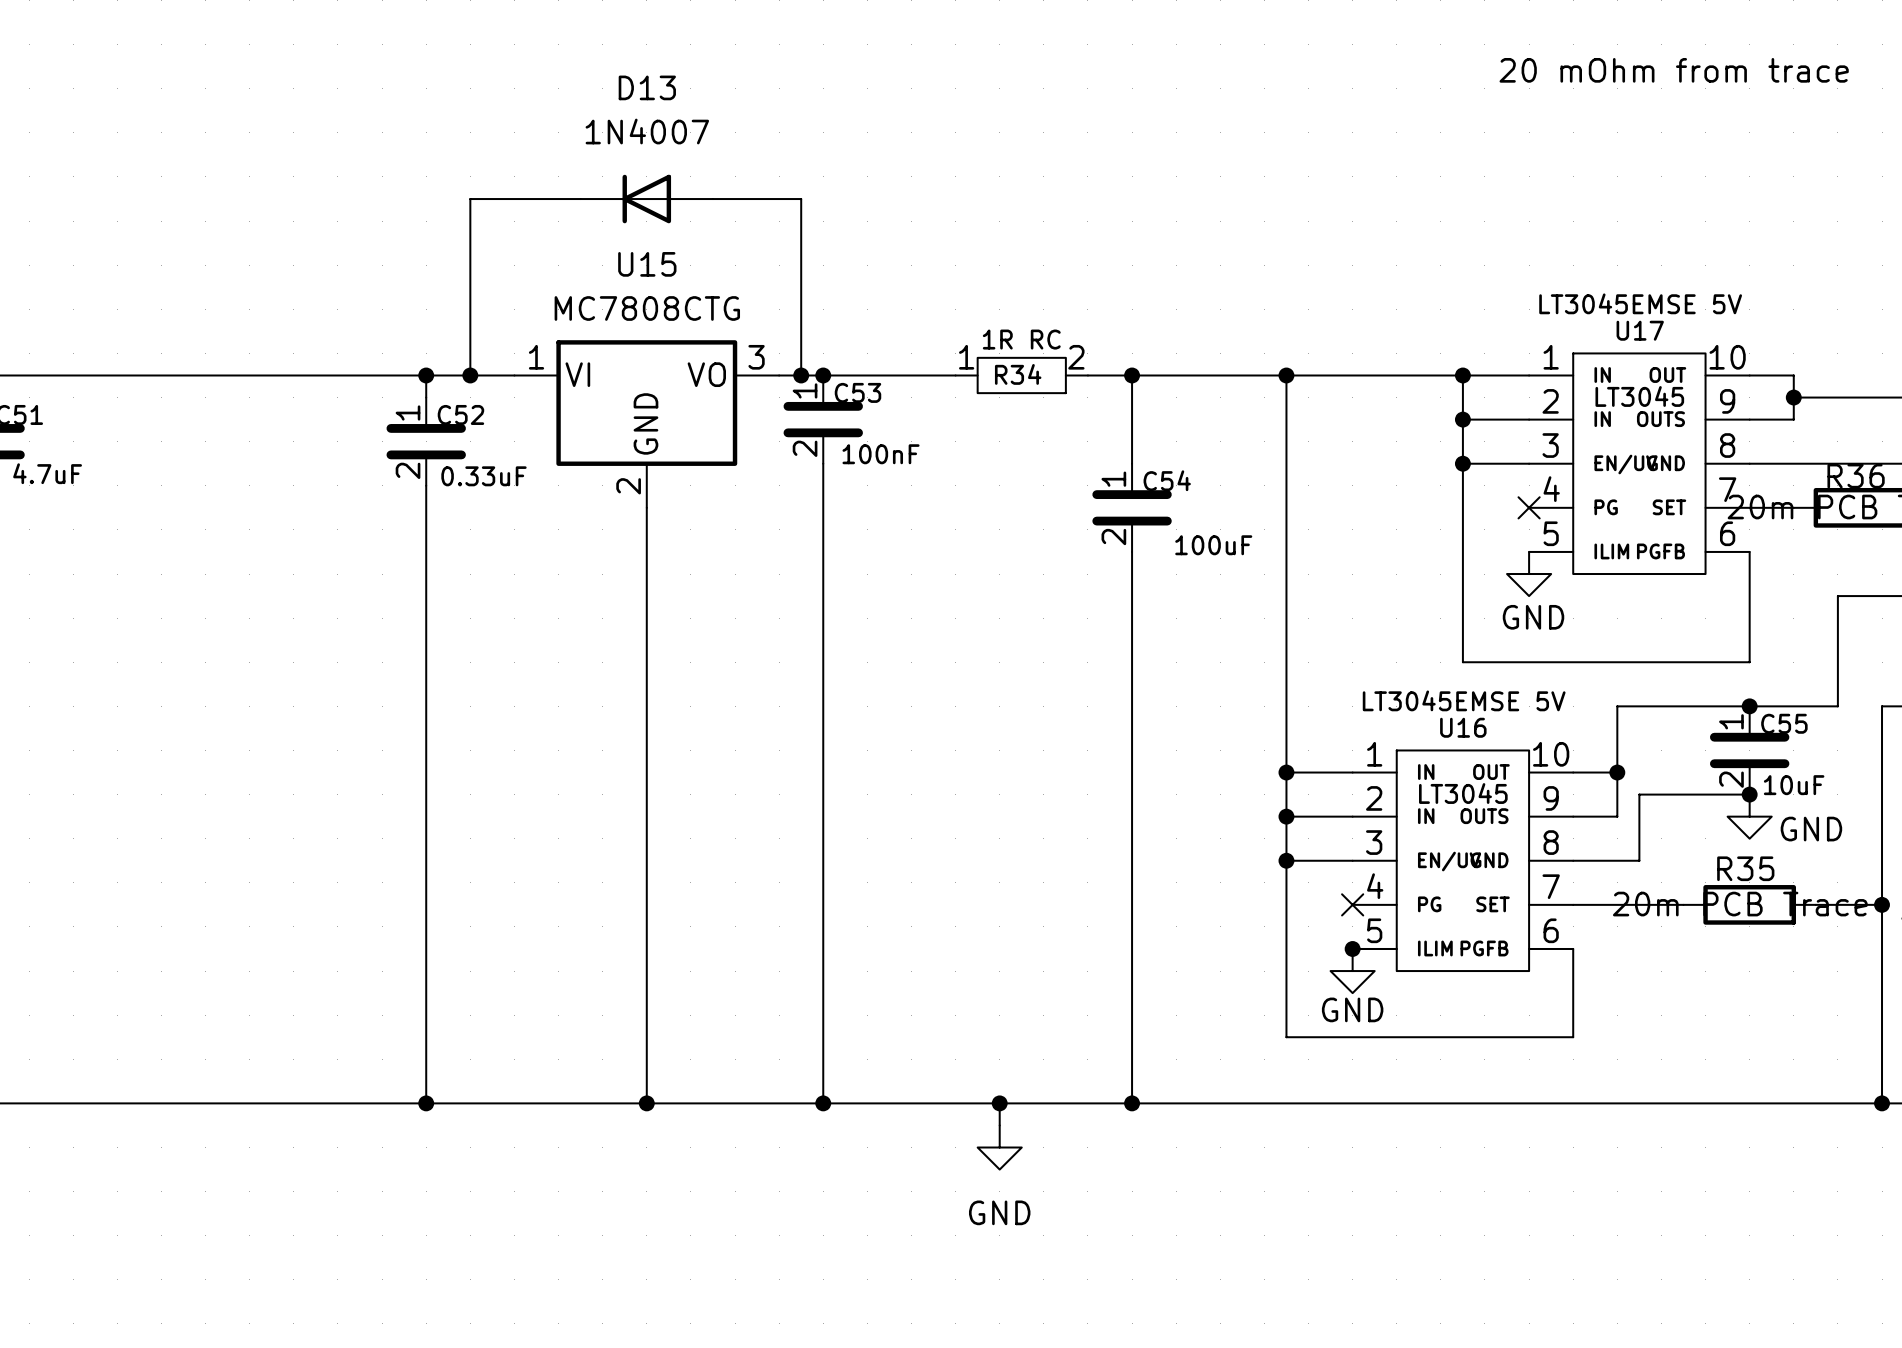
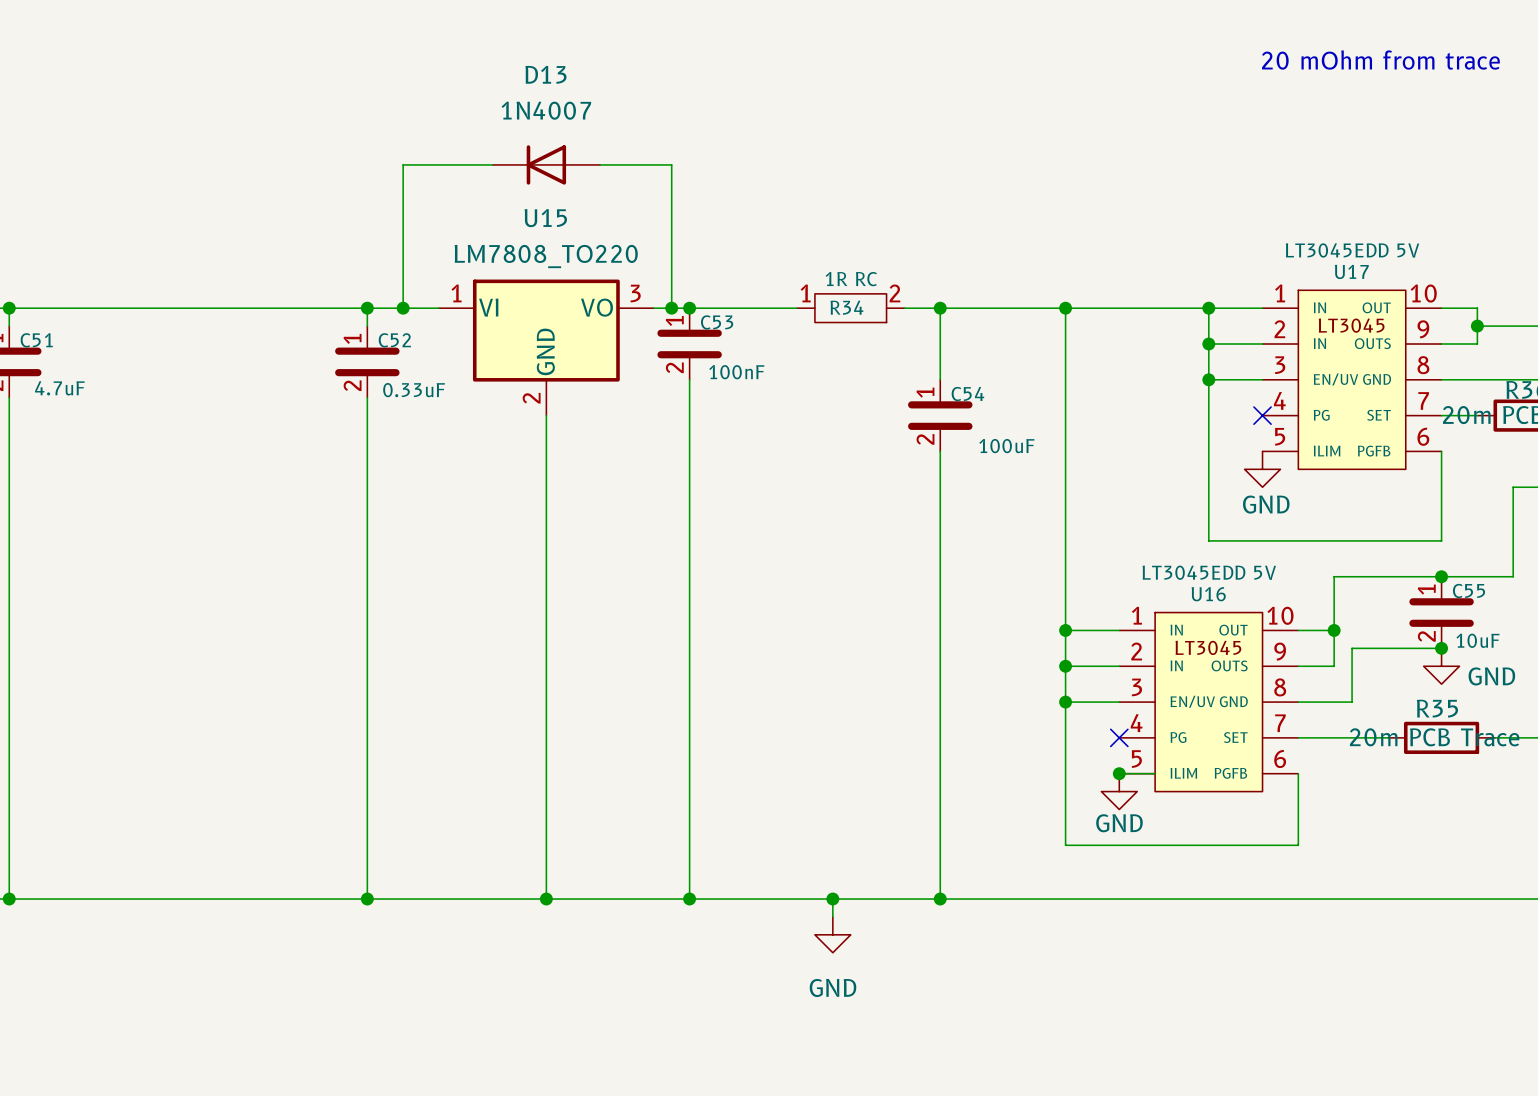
U17 value: LT3045EMSE 5V (1640, 303) -> LT3045EDD 5V (1352, 250)
U15 value: MC7808CTG (647, 308) -> LM7808_TO220 (546, 256)
U16 value: LT3045EMSE 5V (1464, 700) -> LT3045EDD 5V (1209, 572)

